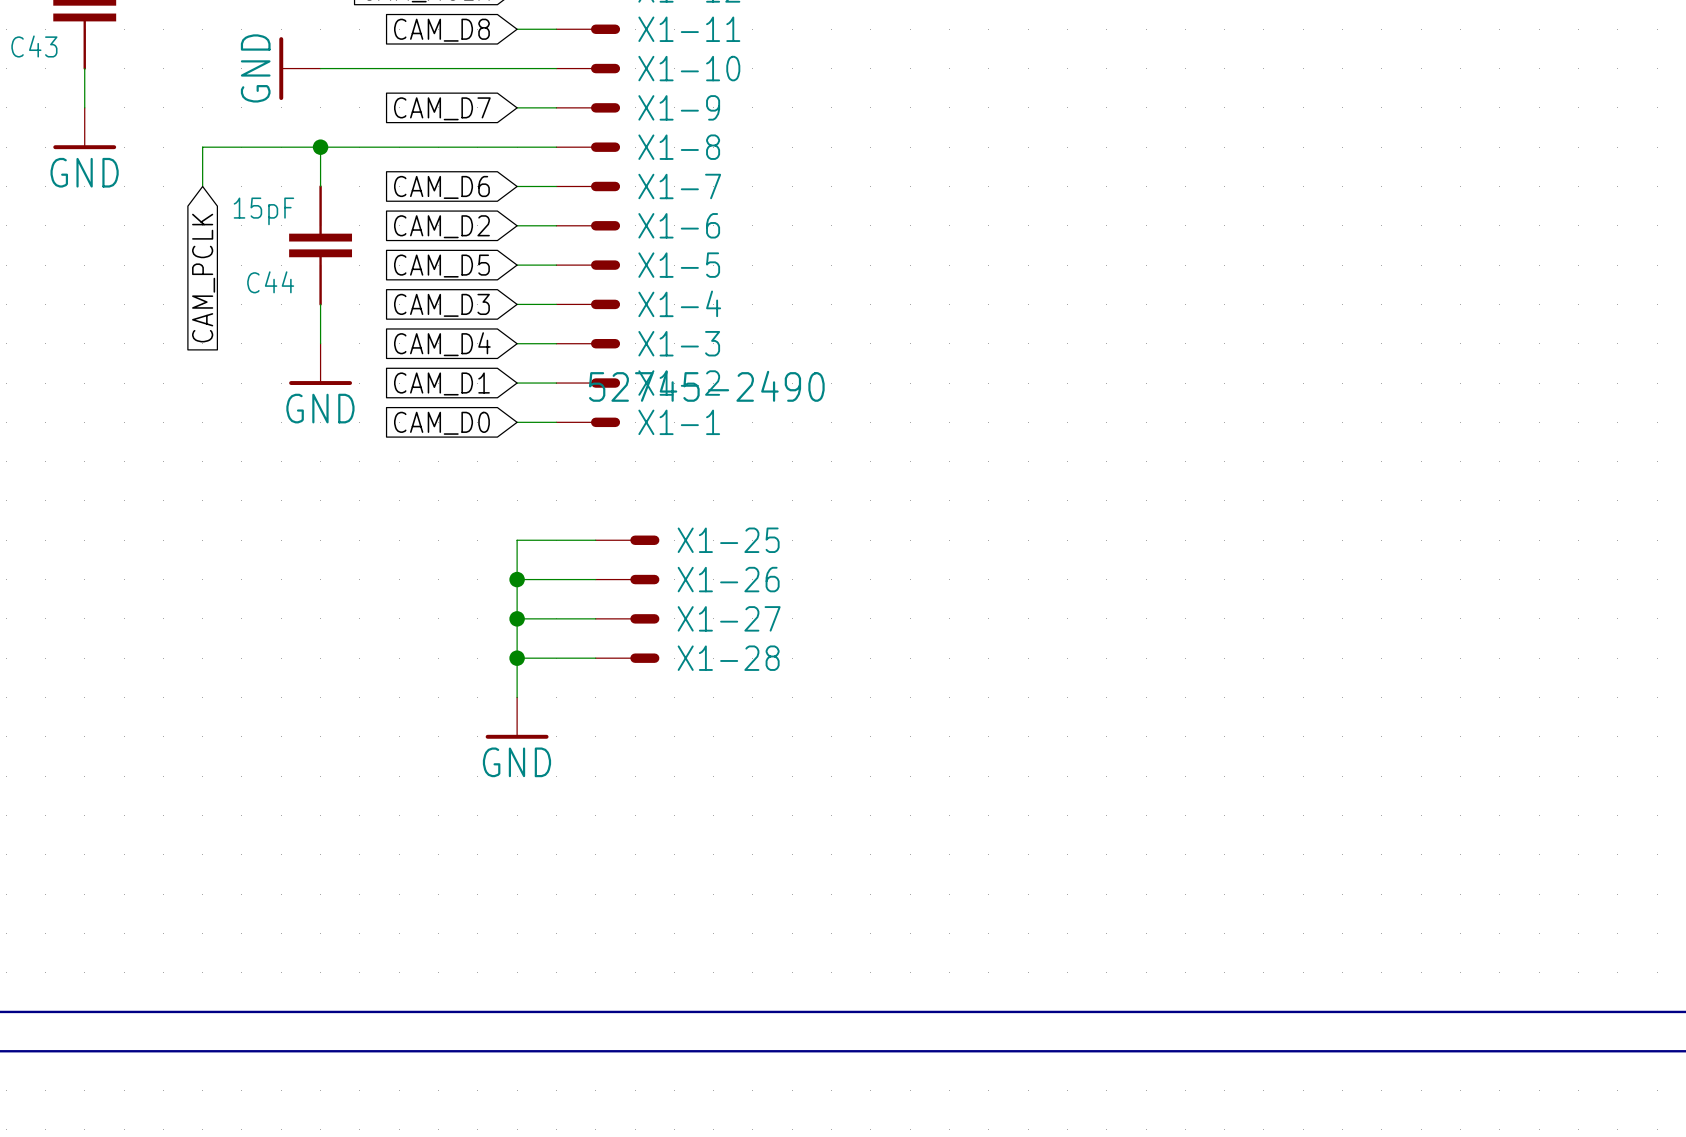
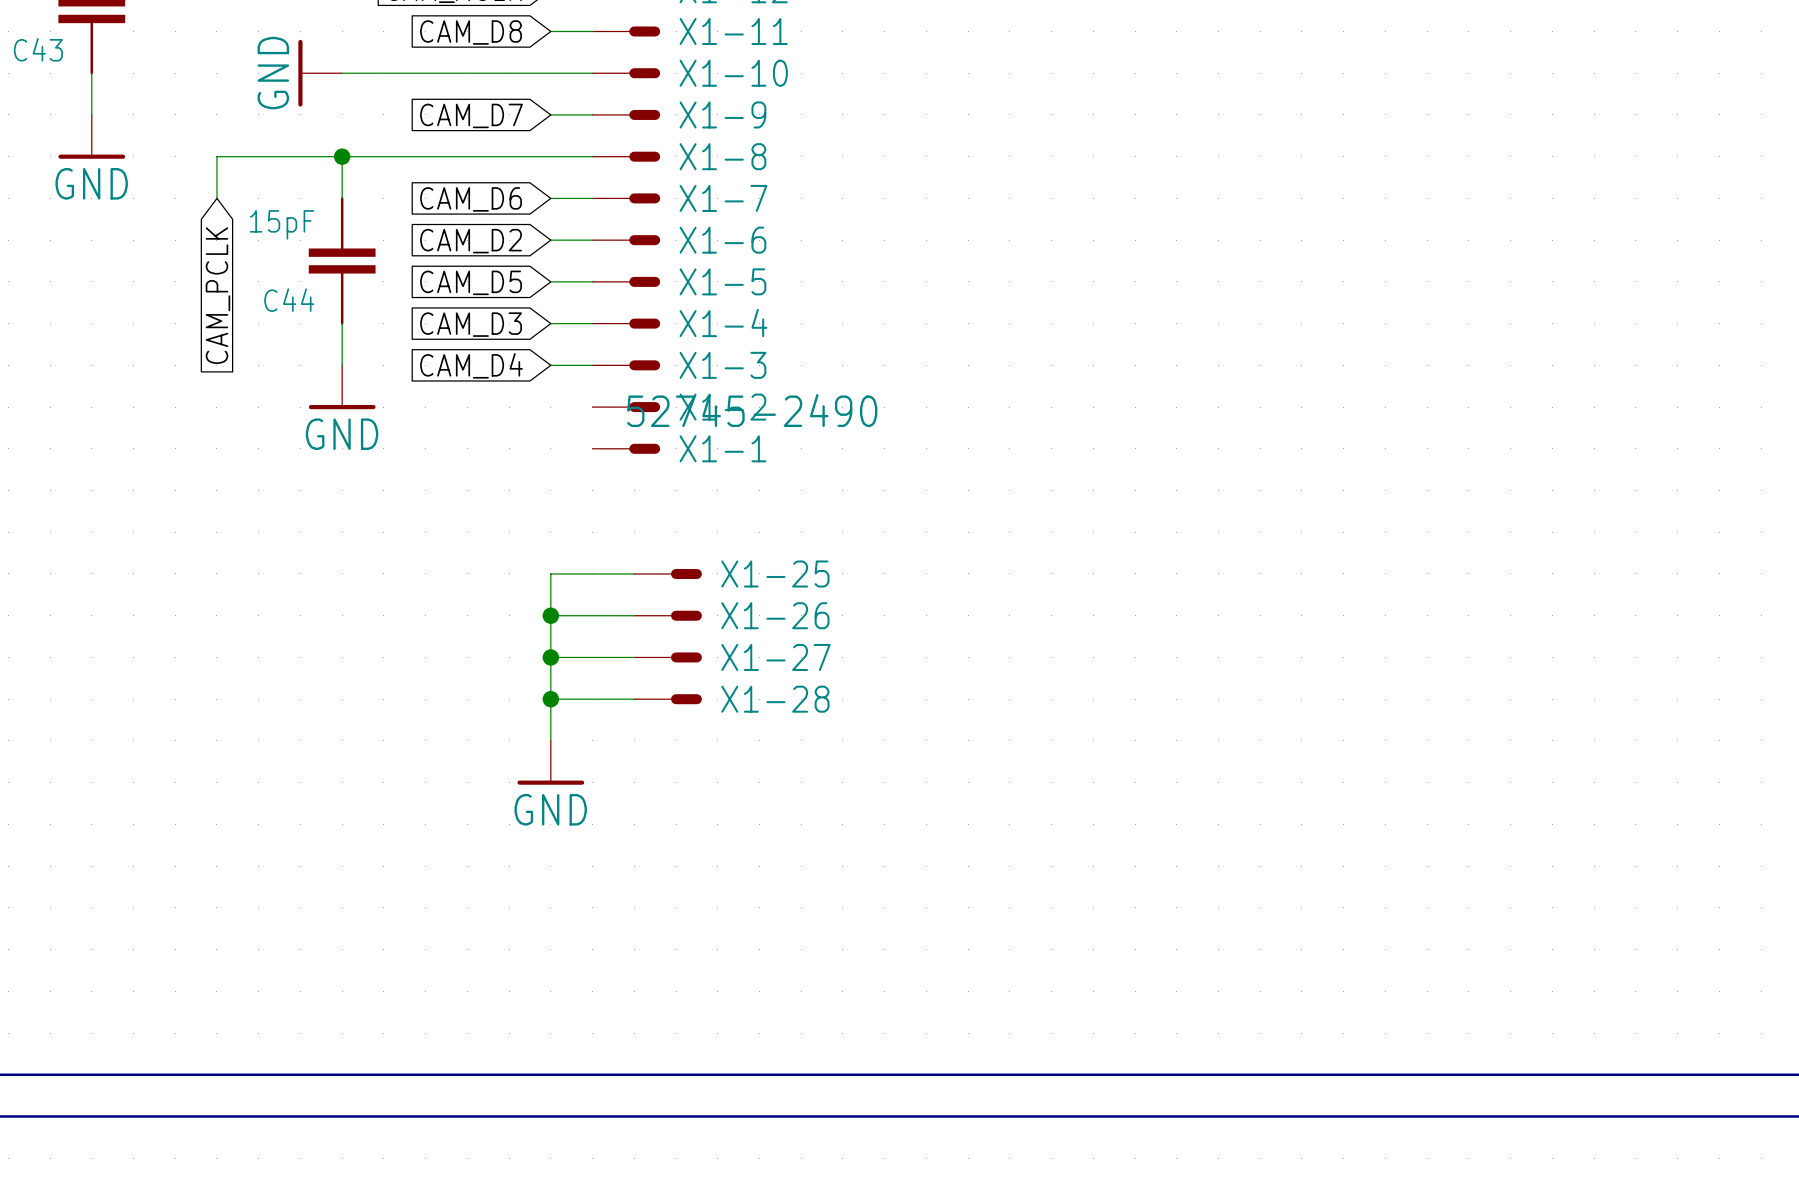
global label: CAM_D1 (441, 383) -> none
wire: (517, 383) (556, 383) -> none
wire: (517, 422) (556, 422) -> none
global label: CAM_D0 (441, 423) -> none

